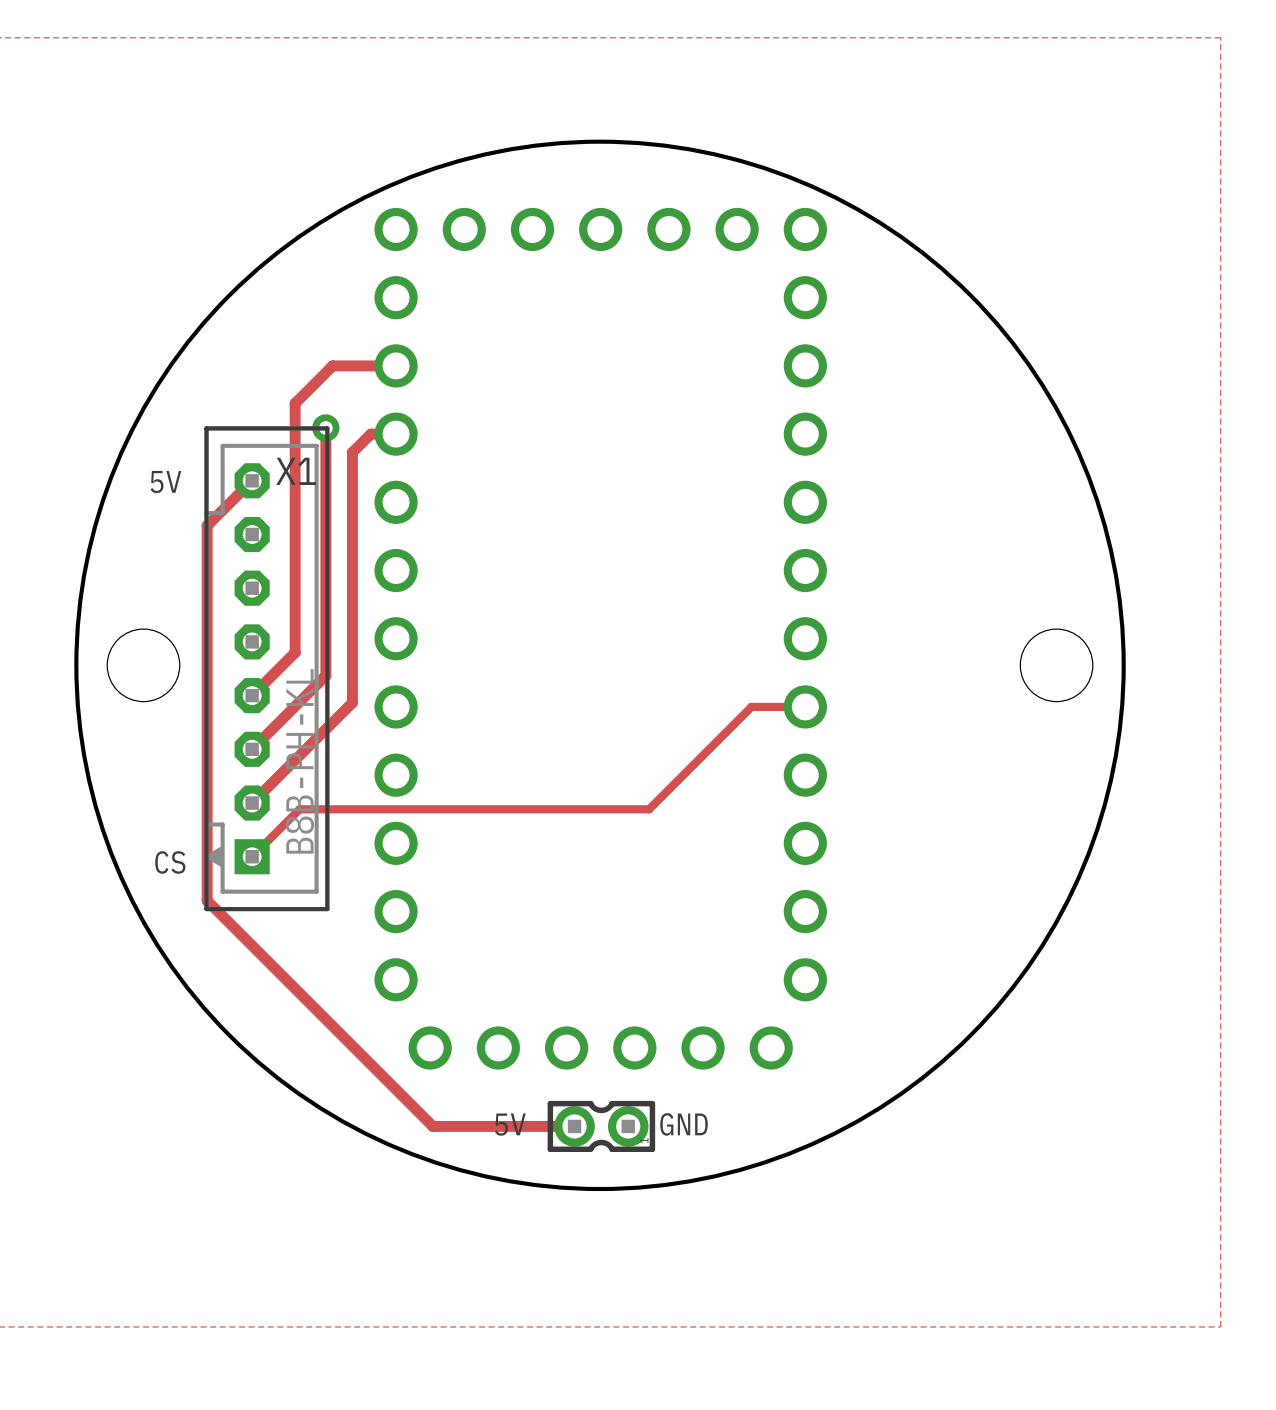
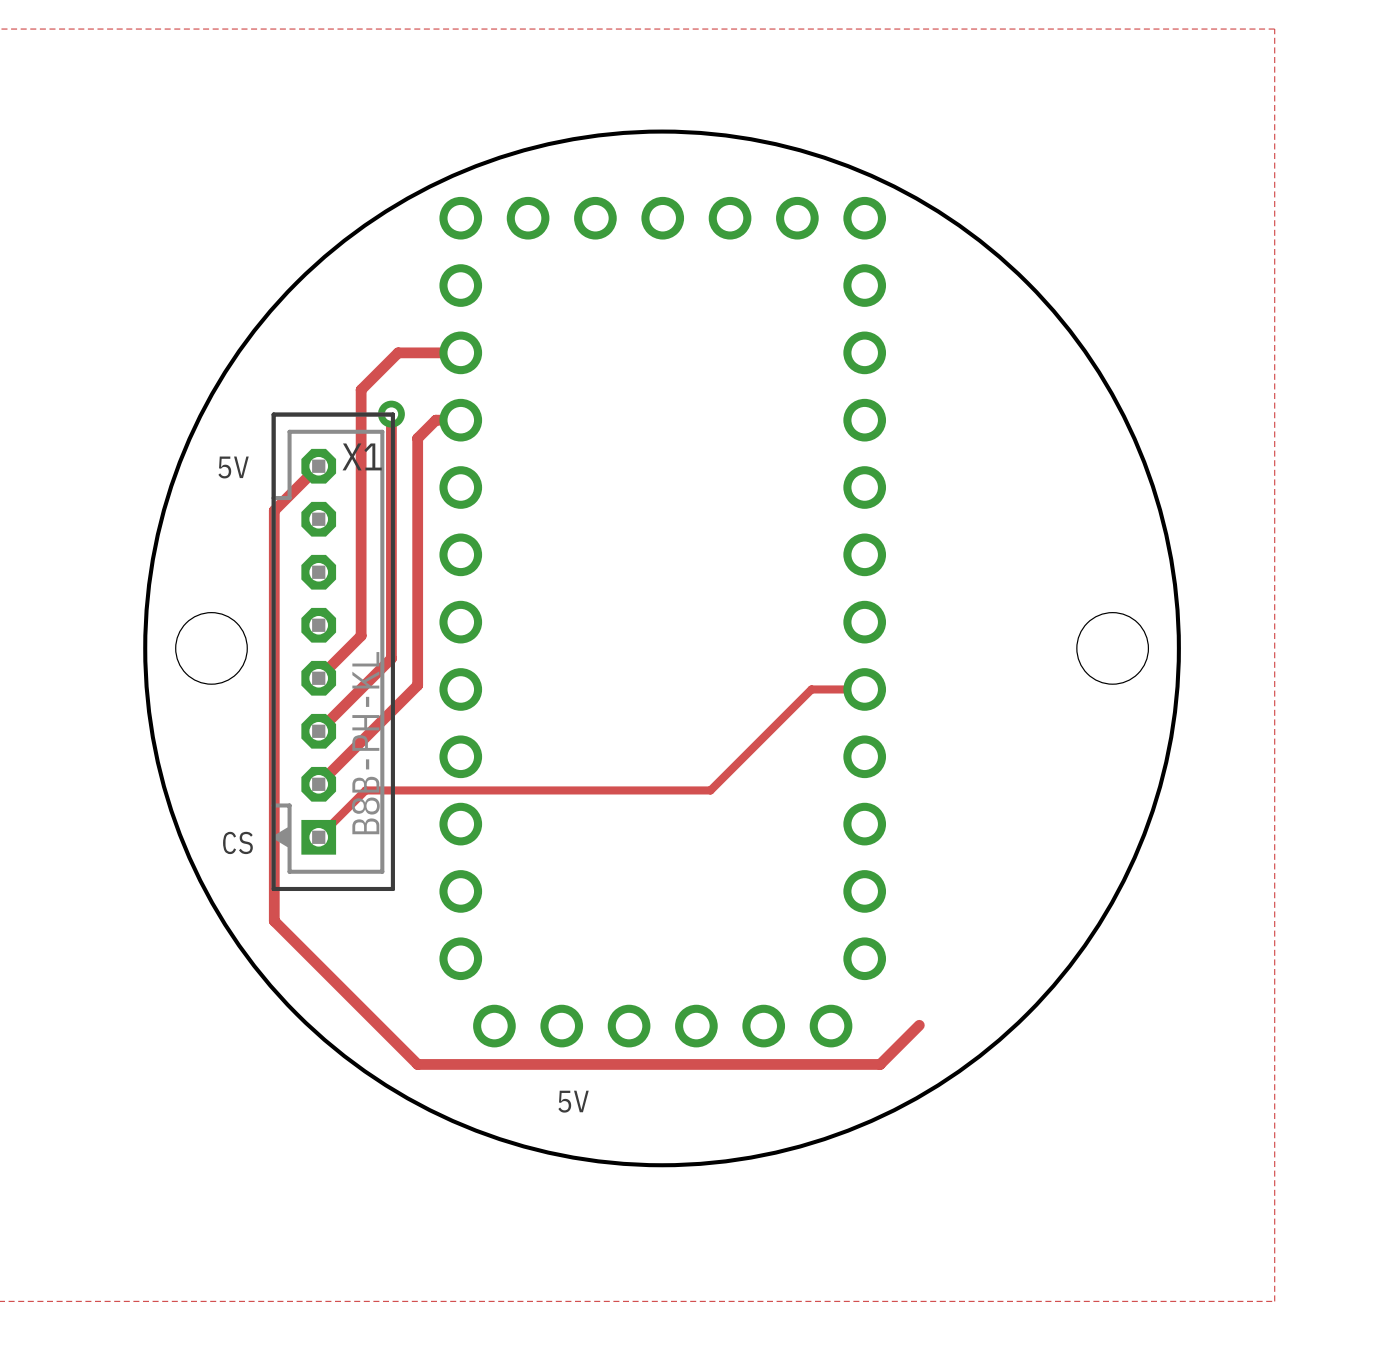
track: (207, 900) (432, 1126) (574, 1126) -> (274, 880) (274, 921) (417, 1064) (880, 1064) (919, 1025)
text: GND (684, 1124) -> none
part: (601, 1126) -> none

